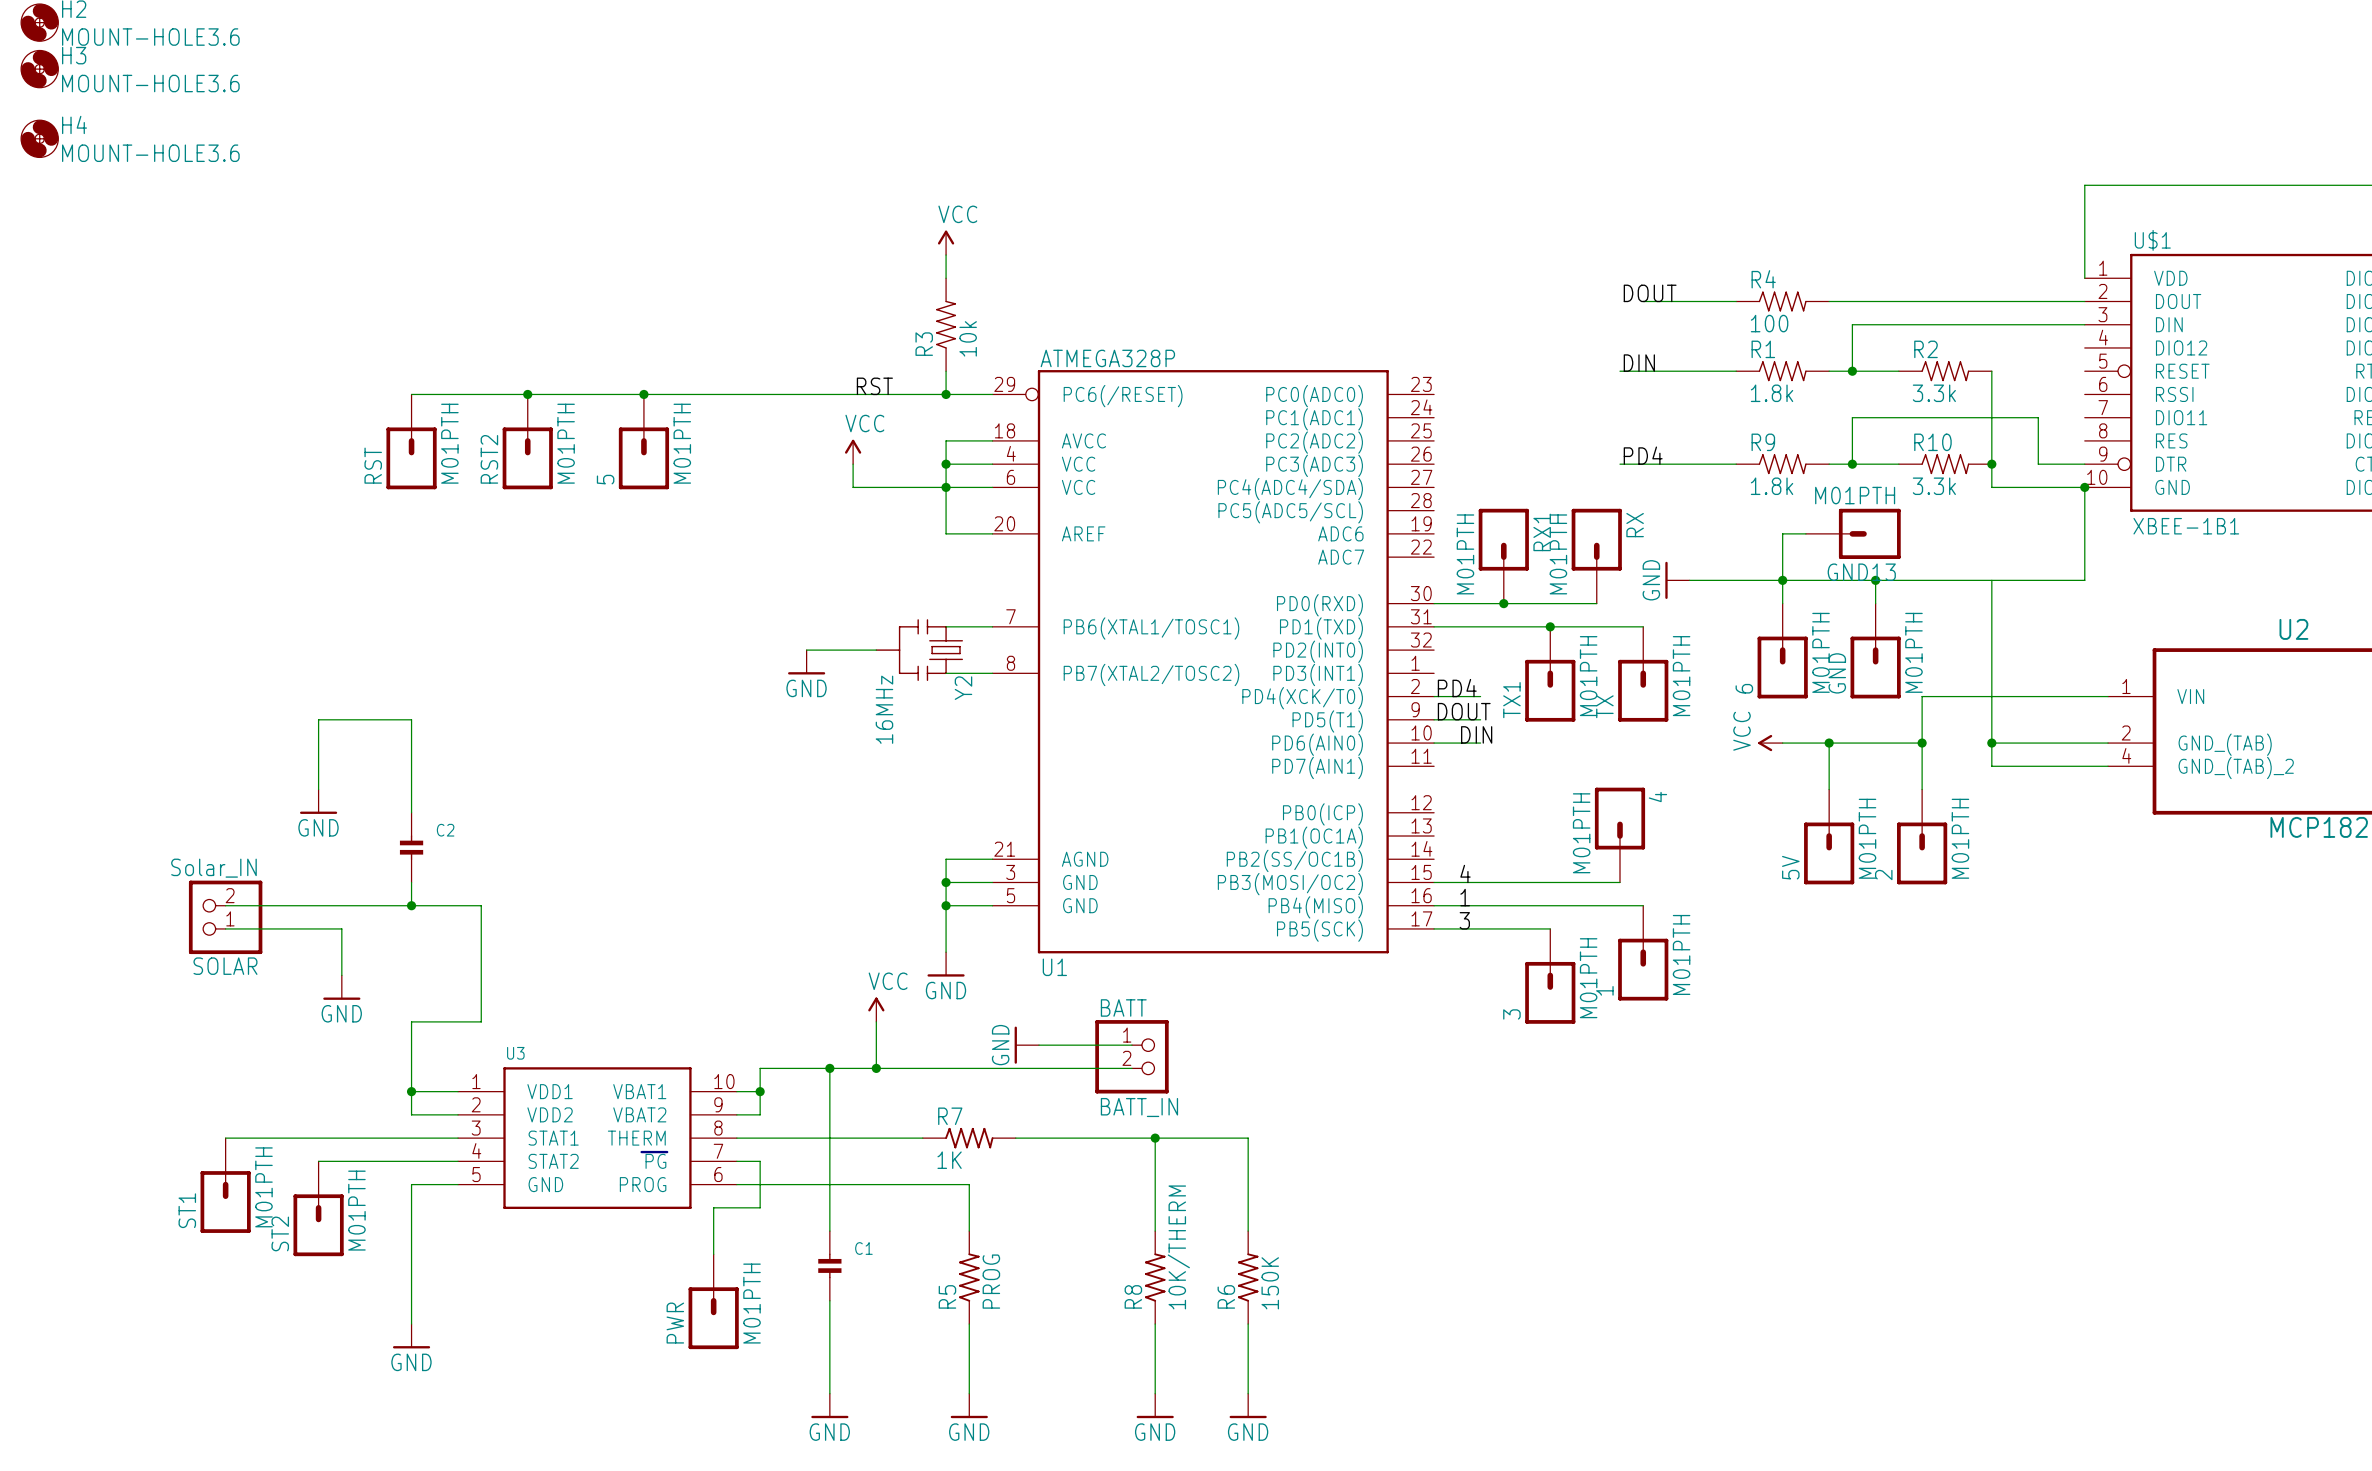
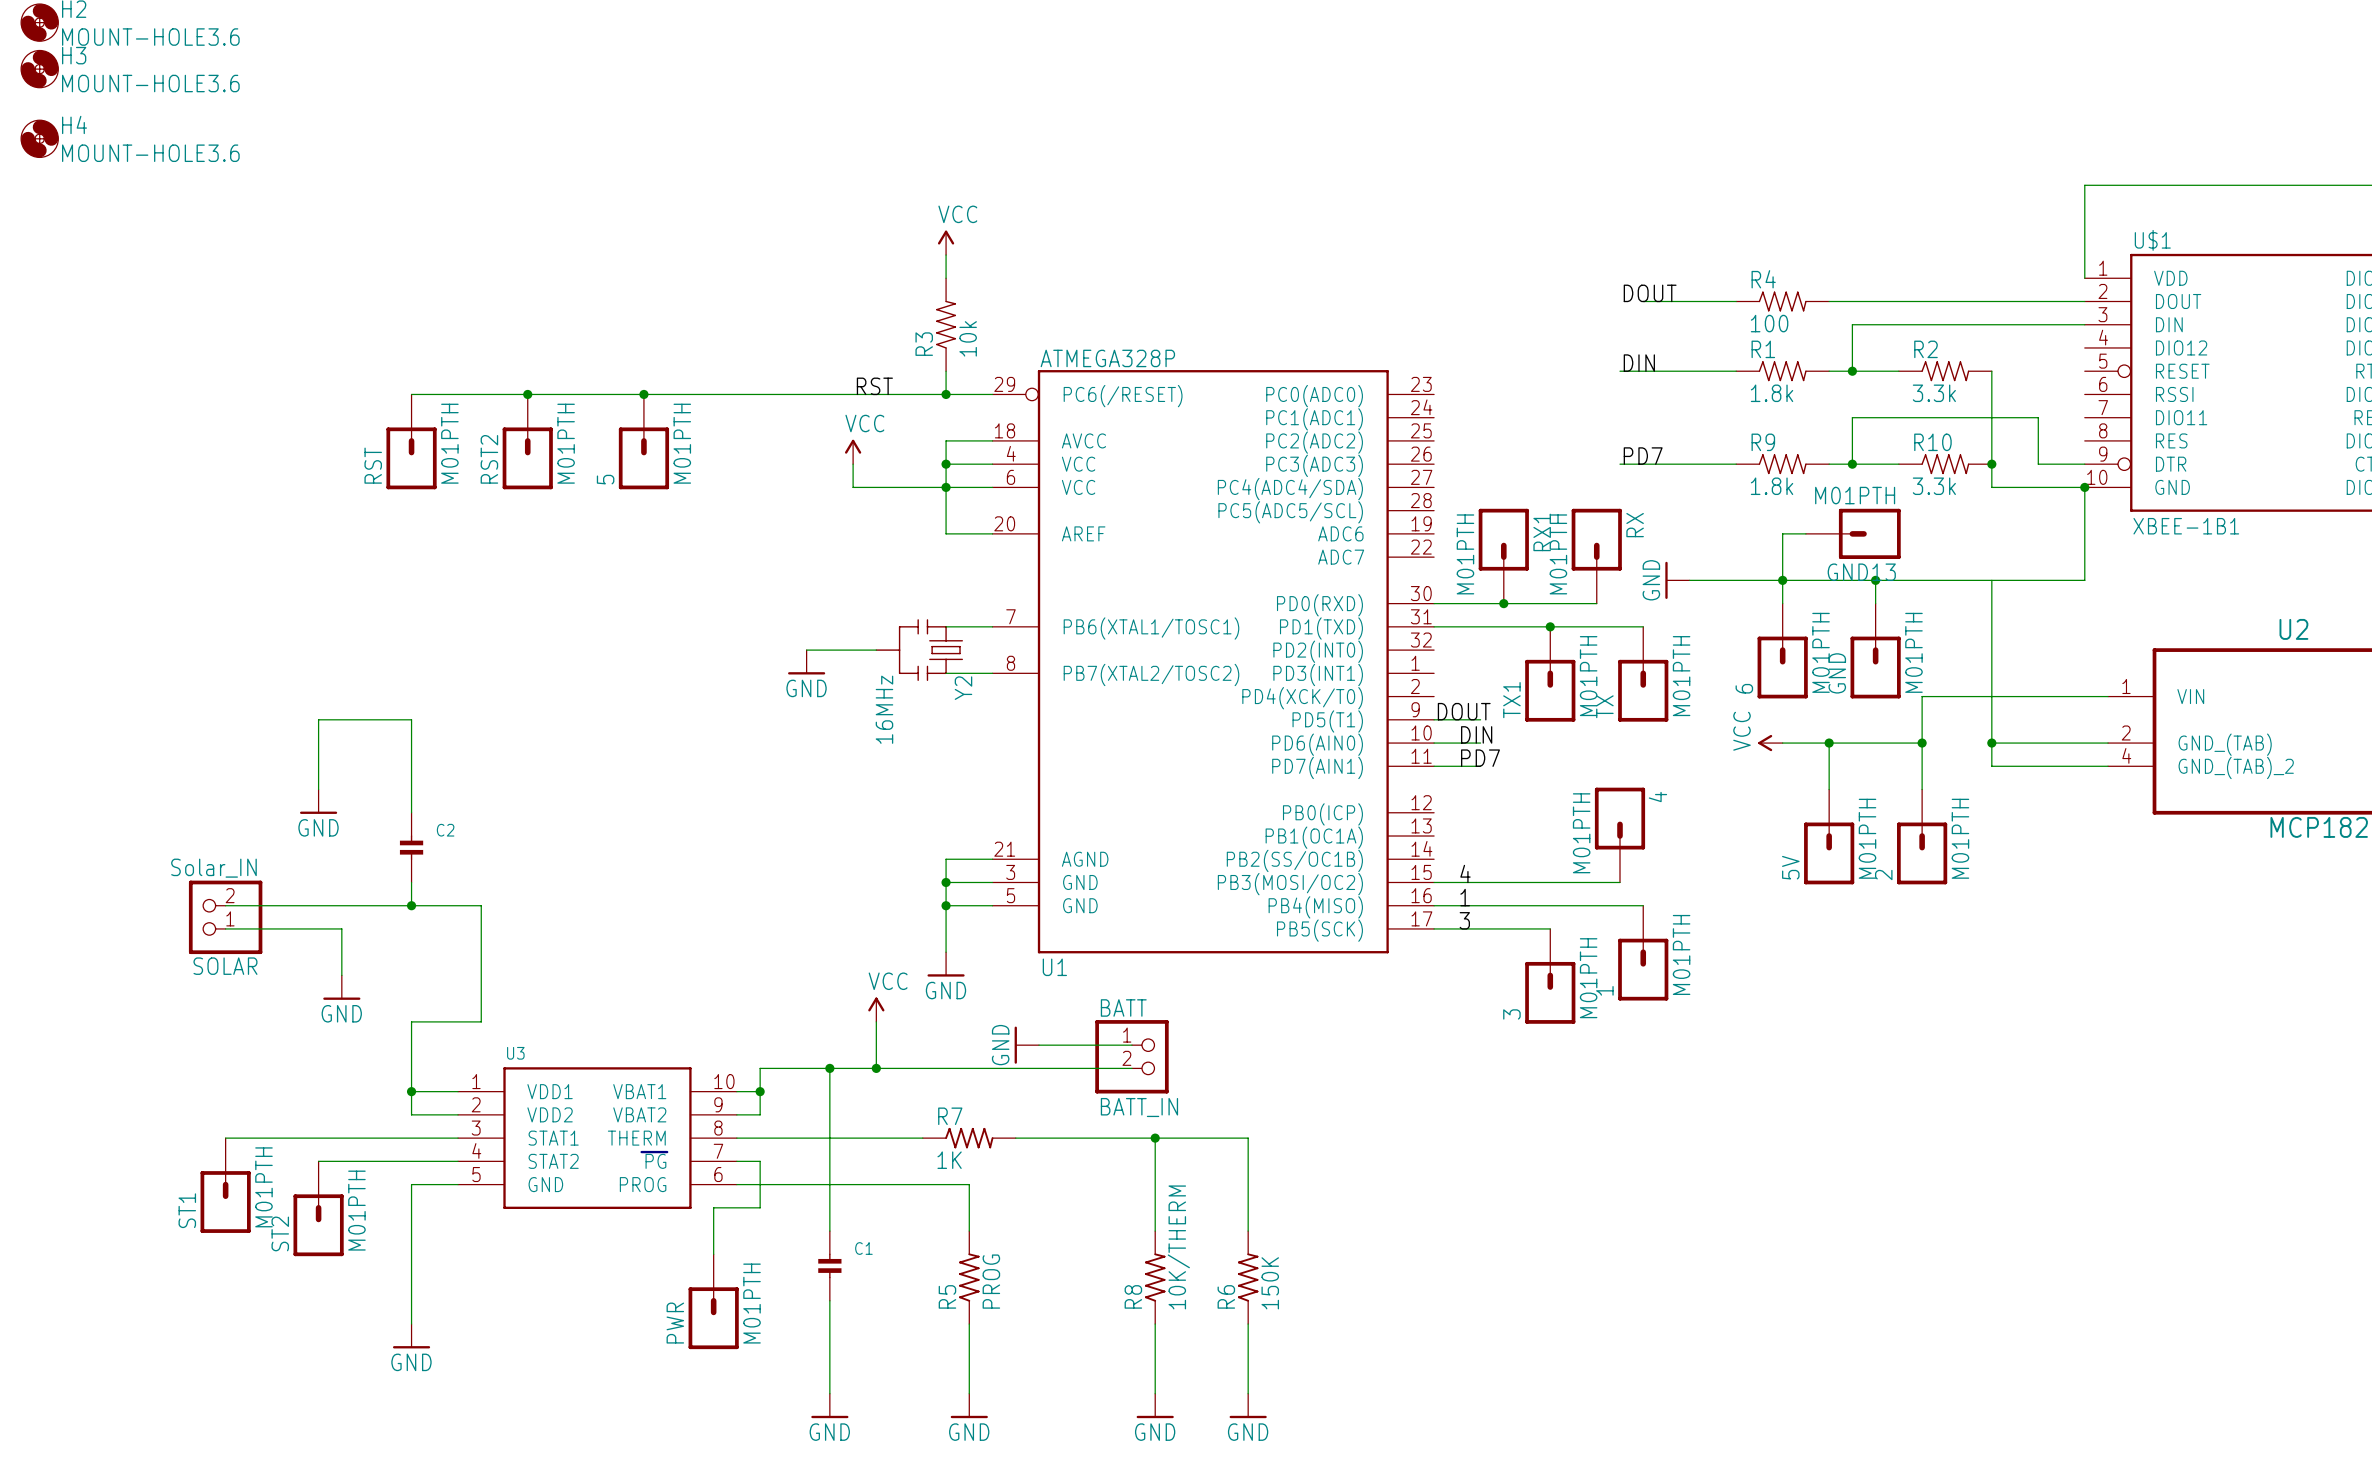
label: PD4 (1643, 455) -> PD7 (1643, 456)
label: PD4 (1457, 688) -> none
wire: (1434, 696) (1480, 696) -> (1434, 766) (1480, 766)
label: none -> PD7 (1480, 758)

